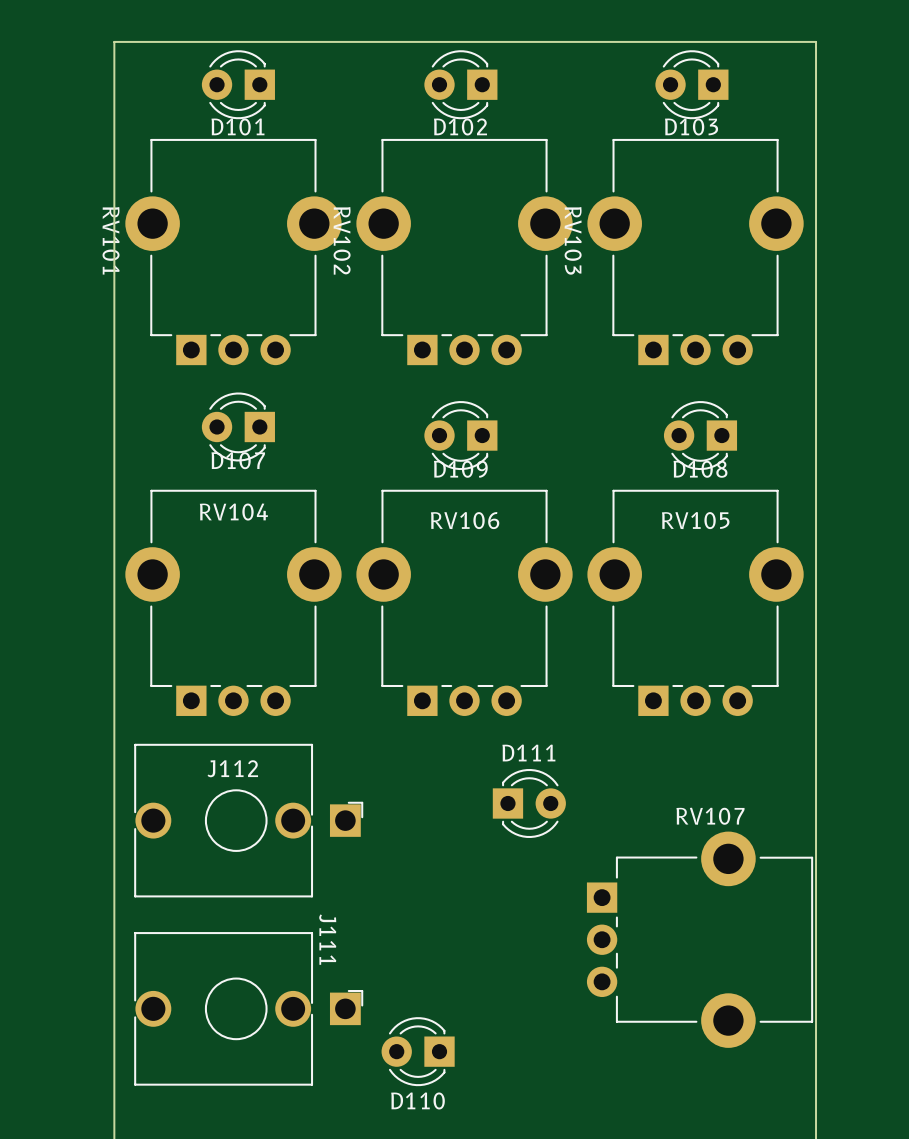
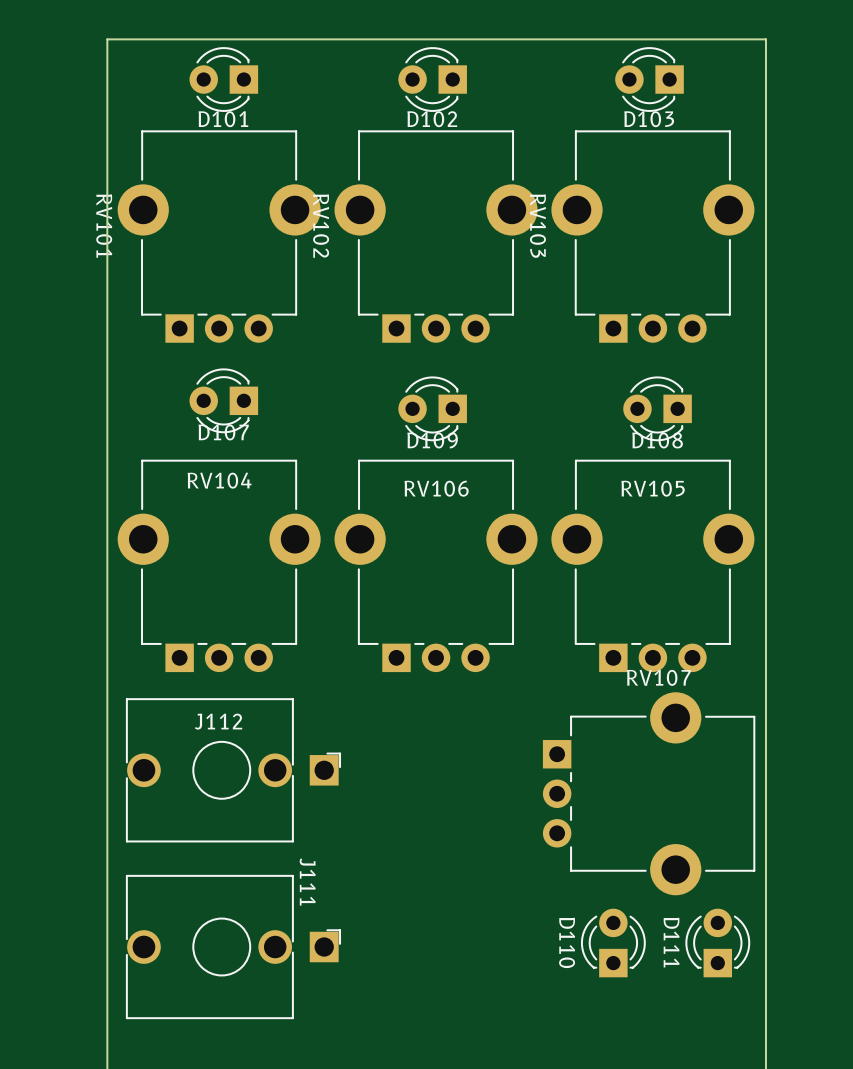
D111 rotation: 0° (529, 803) -> 90° counterclockwise (717, 943)
D111 position: (529, 803) -> (717, 943)
RV107 position: (700, 939) -> (649, 793)
D110 rotation: 0° (418, 1051) -> 90° clockwise (613, 943)
D110 position: (418, 1051) -> (613, 943)

